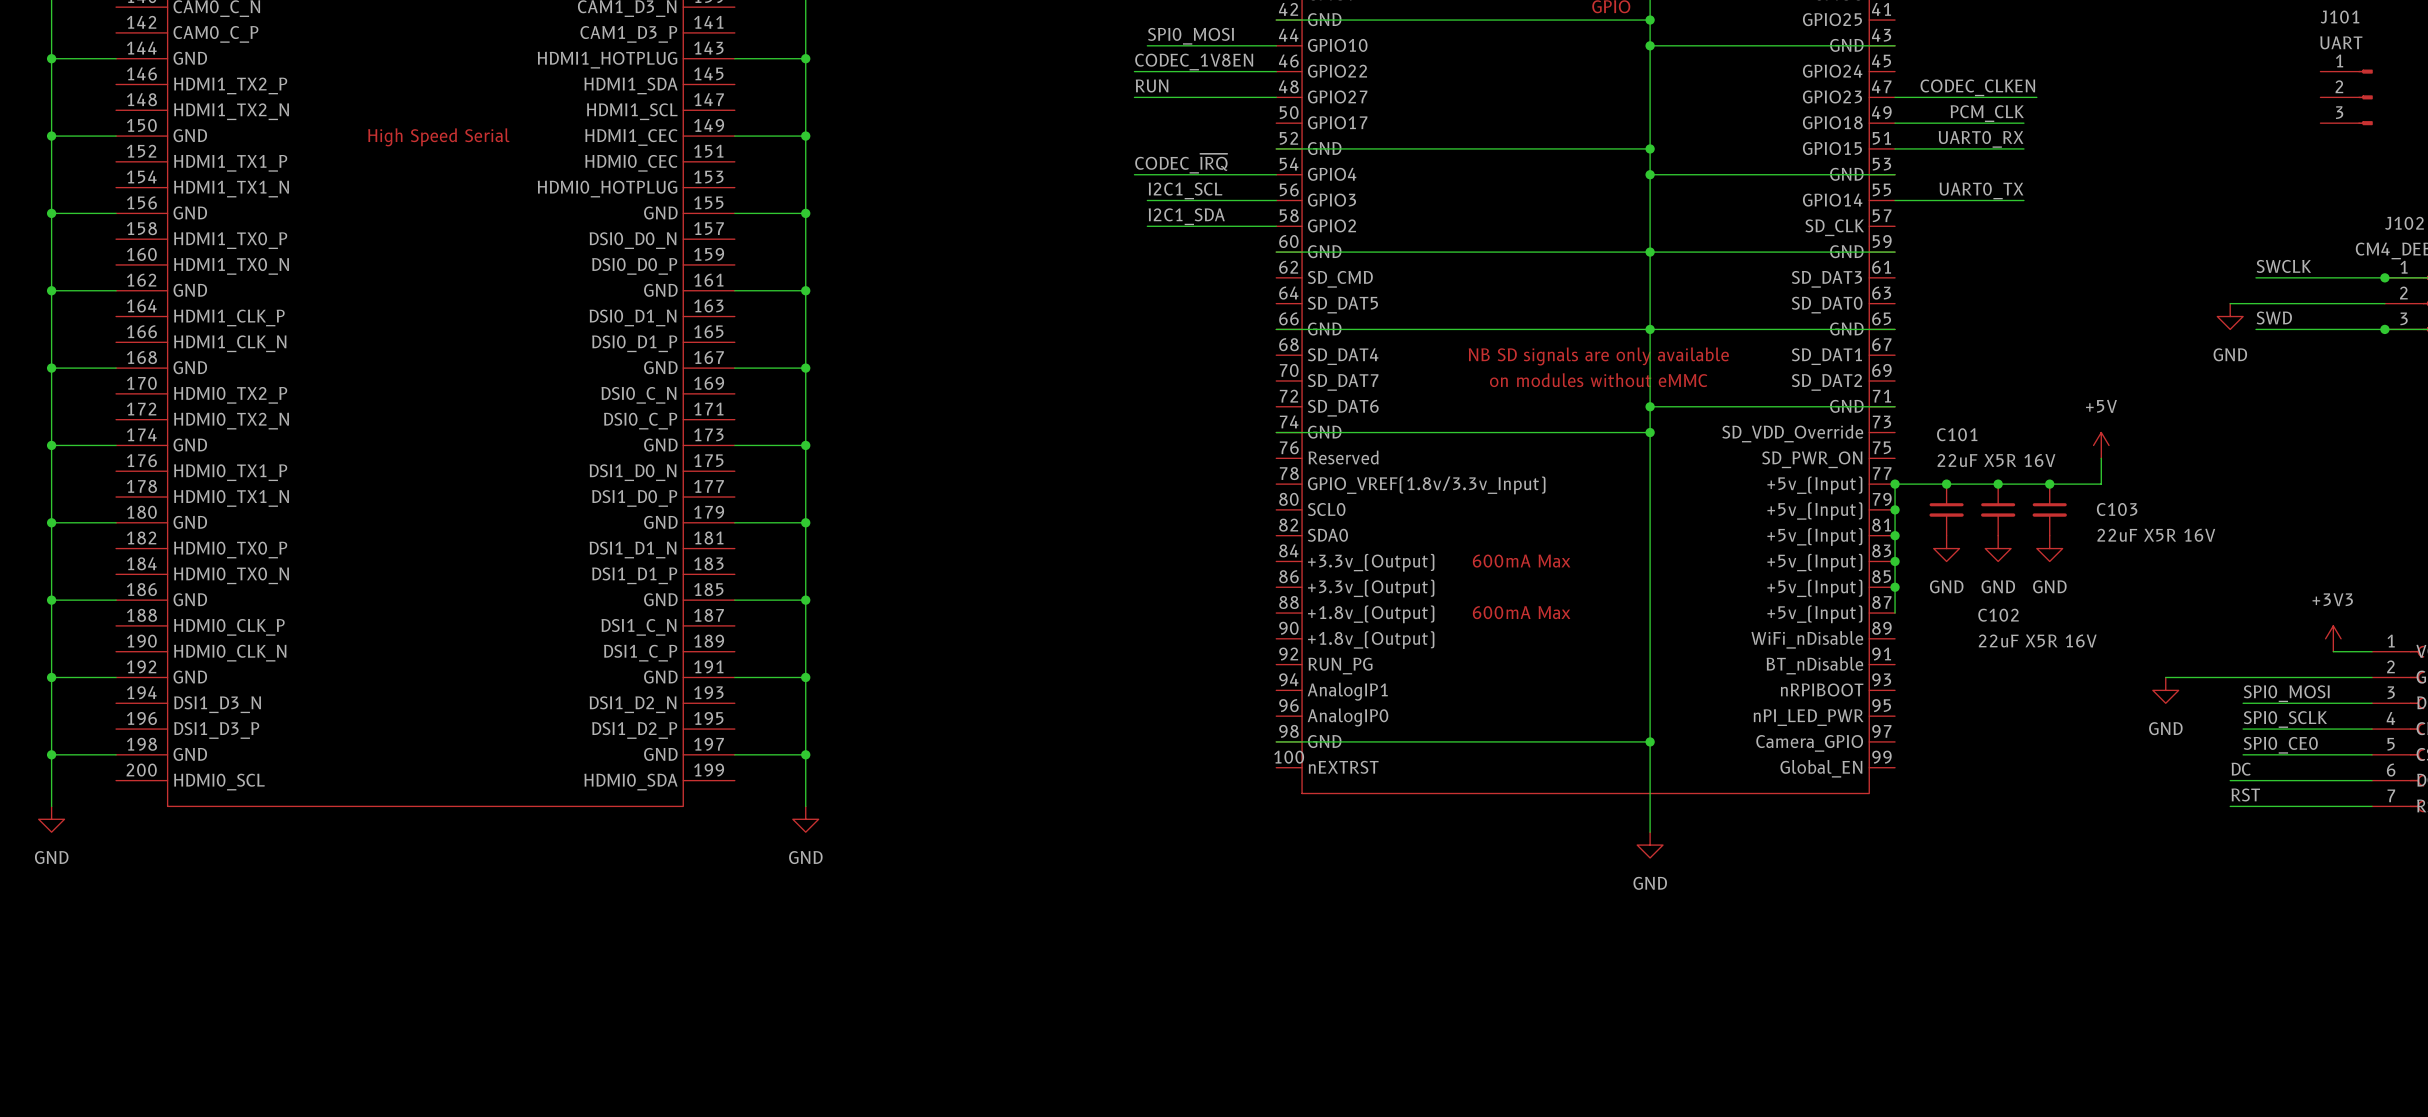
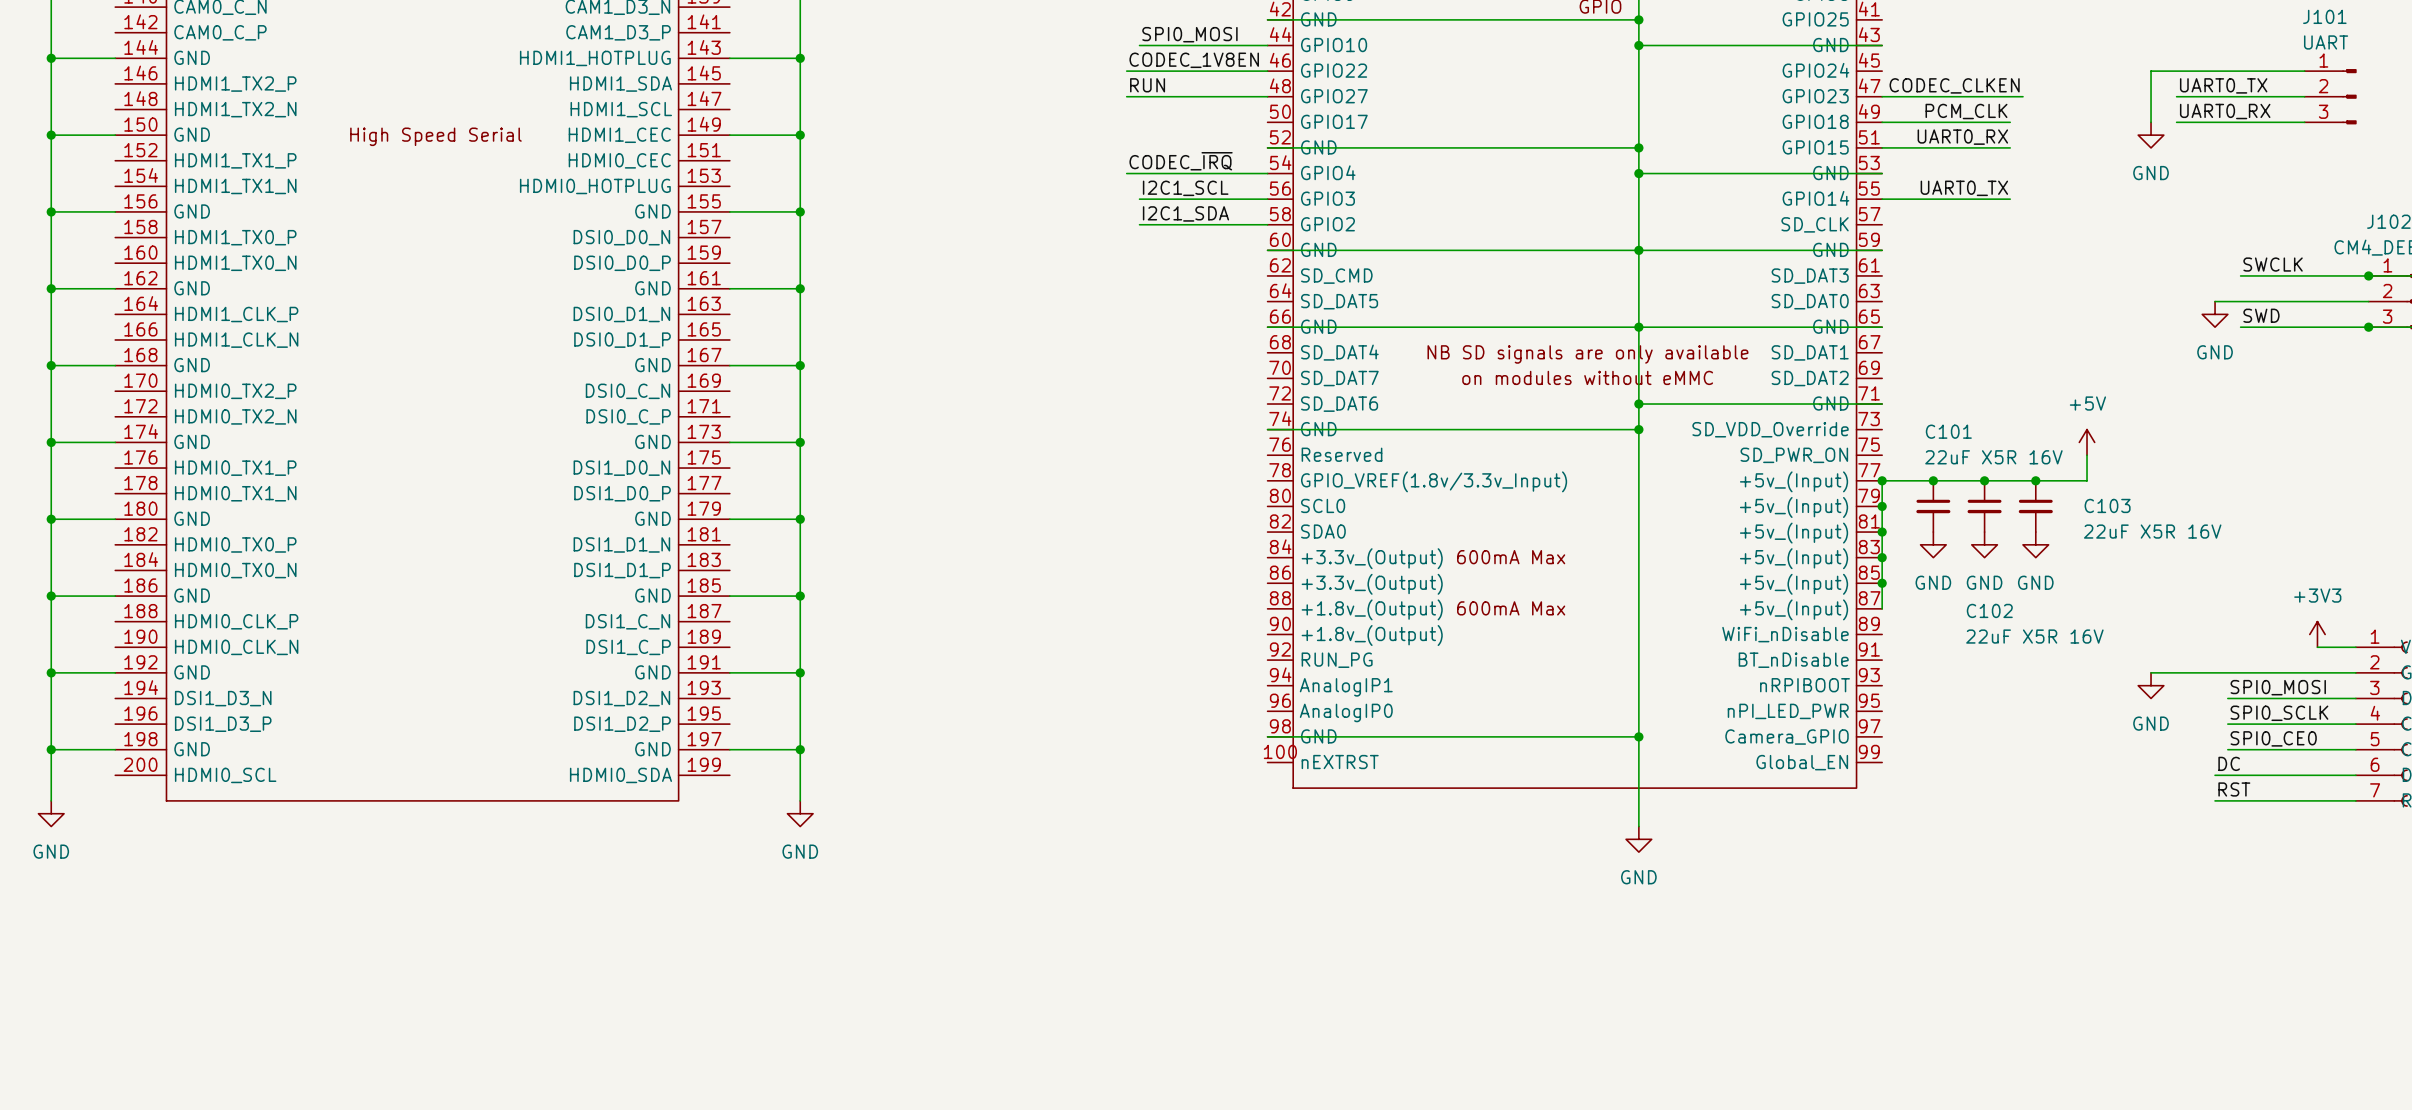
wire: none -> (2304, 71) (2151, 71) (2151, 122)
label: none -> UART0_TX (2223, 85)
wire: none -> (2176, 96) (2304, 96)
label: none -> UART0_RX (2225, 111)
wire: none -> (2176, 122) (2304, 122)
power symbol: none -> GND (2151, 135)

